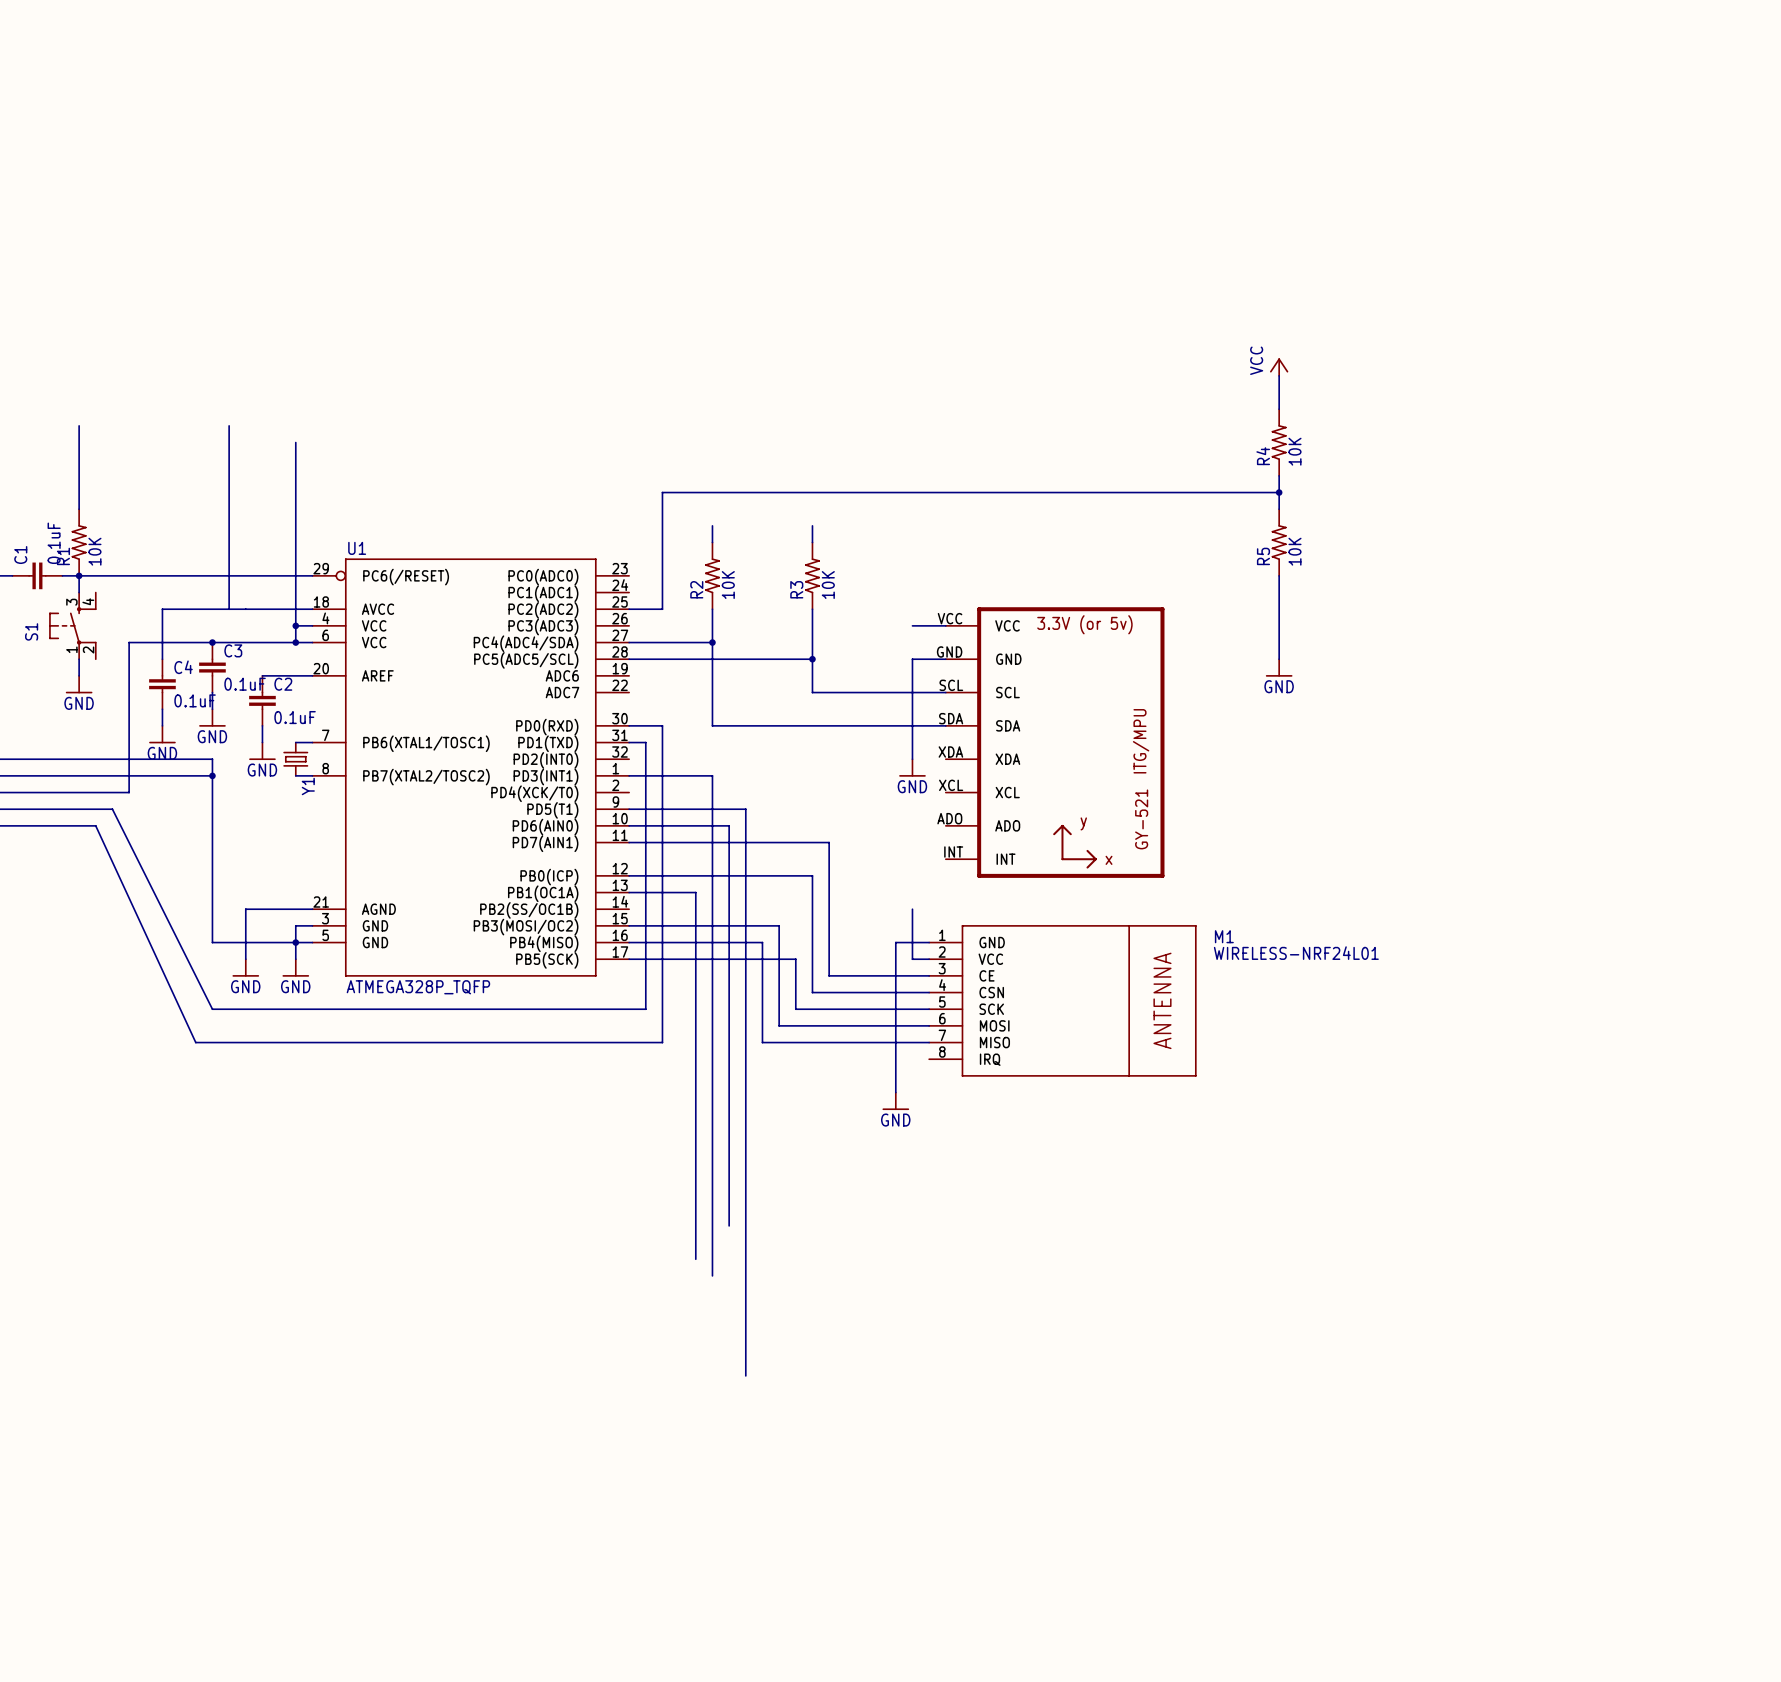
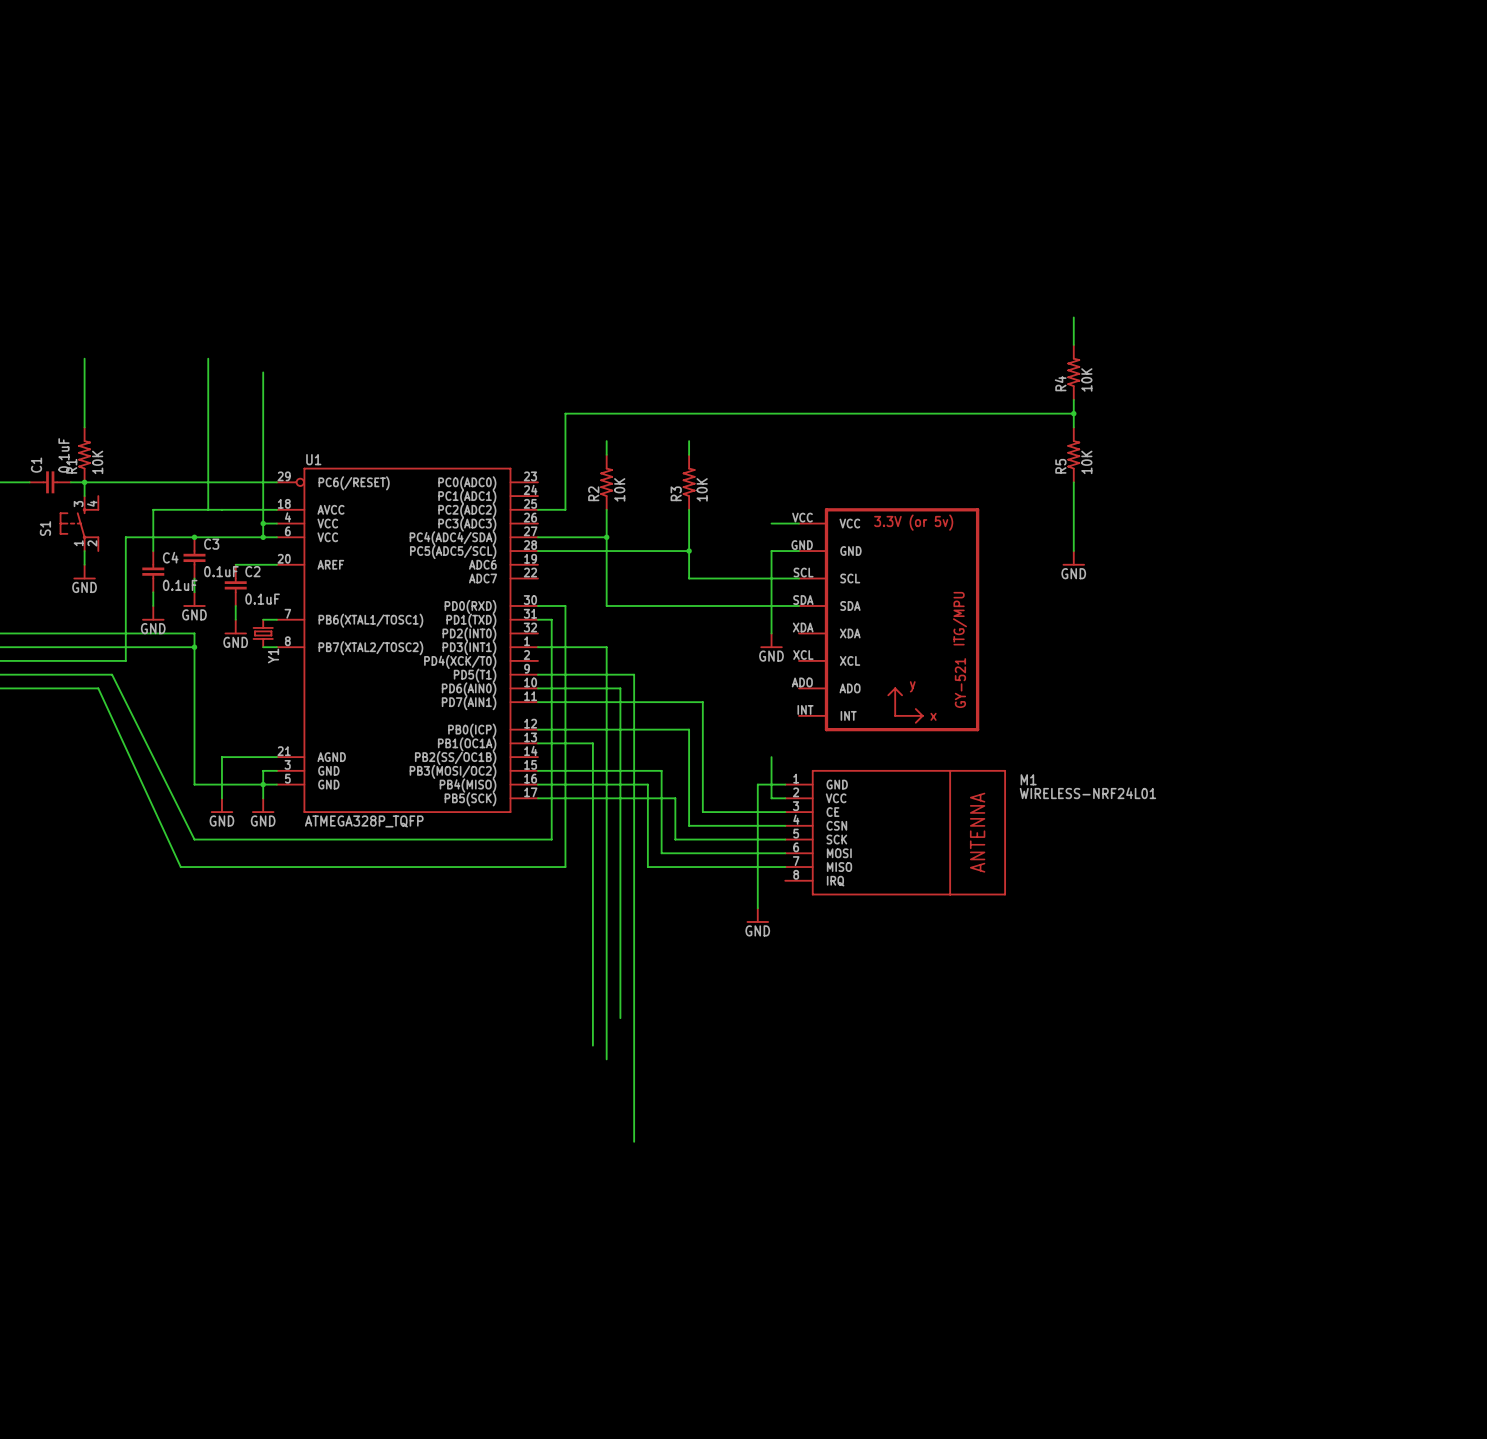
power symbol: VCC (1279, 367) -> none

